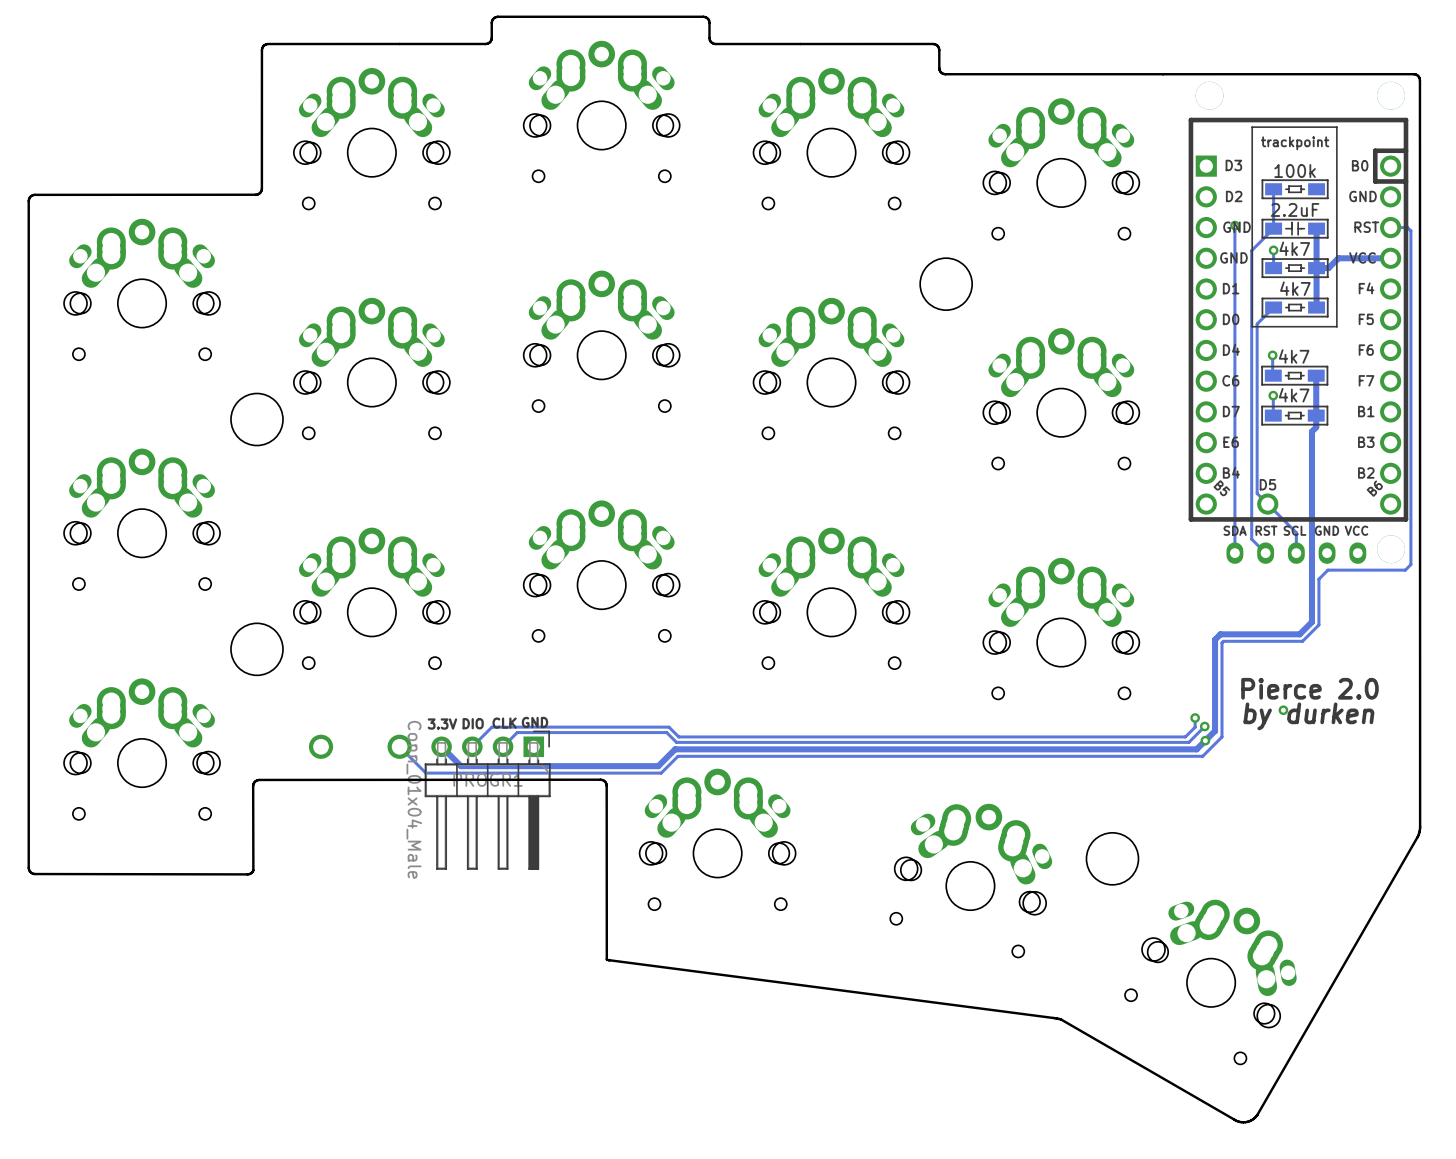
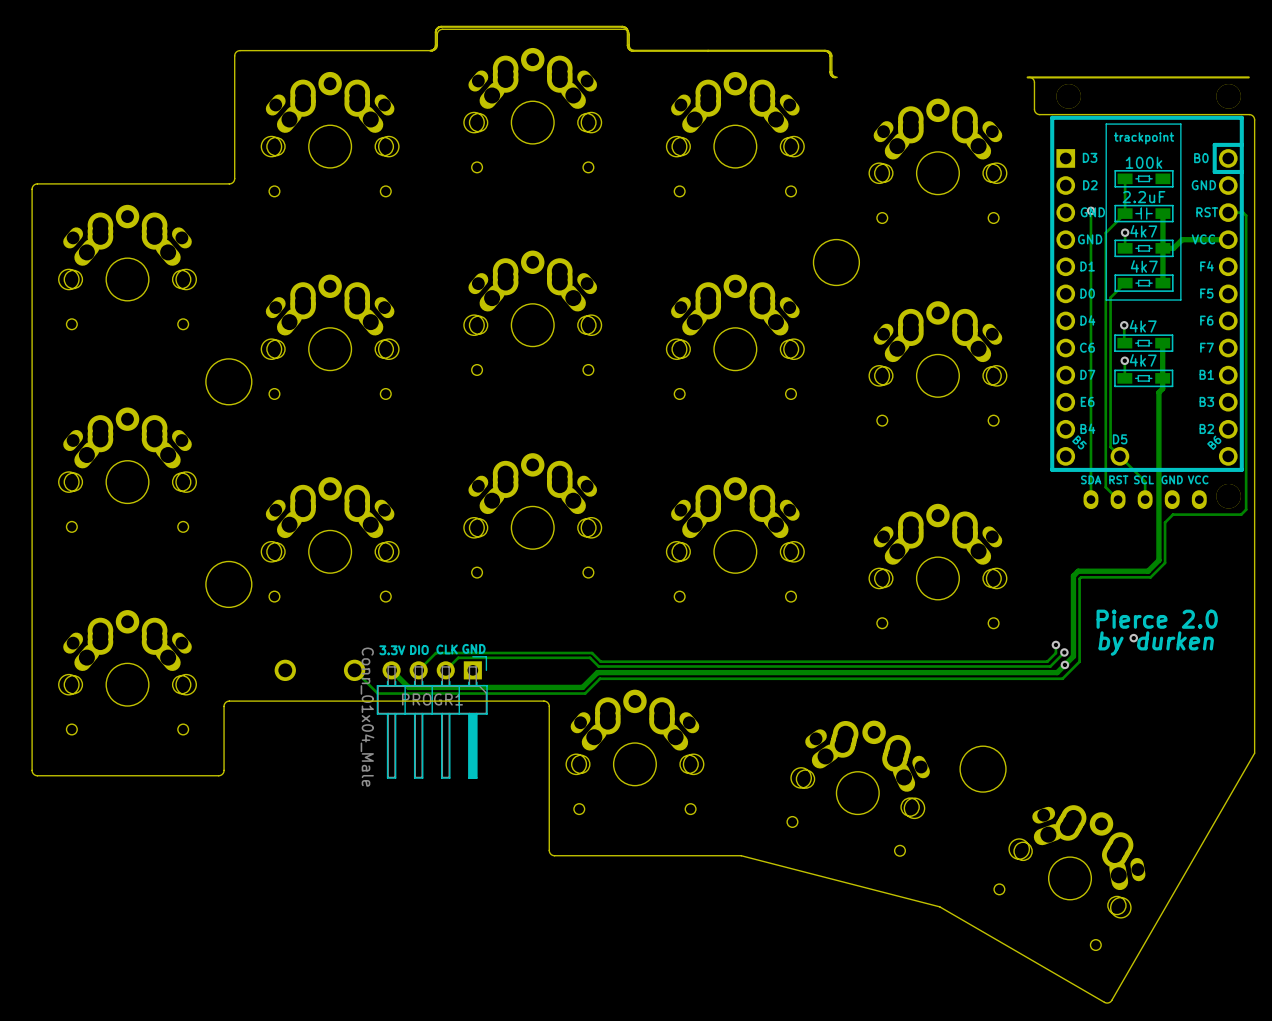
board edge: (485, 43) (264, 45) (261, 50) (261, 188) (257, 194) (34, 194) (29, 197) (29, 871) (34, 874) (249, 874) (253, 870) (253, 786) (254, 782) (259, 779) (602, 780) (606, 785) (606, 959) (1059, 1019) (1235, 1120) (1247, 1121) (1257, 1114) -> none
board edge: (1163, 74) (945, 74) -> none
board edge: none -> (1029, 77) (1034, 81) (1034, 109) (1039, 114) (1249, 114) (1254, 119) (1254, 753) (1110, 1002) (1104, 1002) (939, 906) (741, 855) (552, 855) (549, 850) (549, 706) (545, 701) (228, 701) (224, 705) (224, 770) (220, 775) (37, 775) (33, 773) (32, 189) (34, 185) (232, 183) (234, 178) (234, 55) (239, 50) (431, 50) (436, 47) (437, 33) (441, 29) (623, 29) (628, 32) (629, 46) (633, 50) (827, 50) (831, 55) (832, 73) (837, 77)
board edge: (1413, 74) (1417, 75) (1419, 80) (1419, 830) (1257, 1114) -> none

